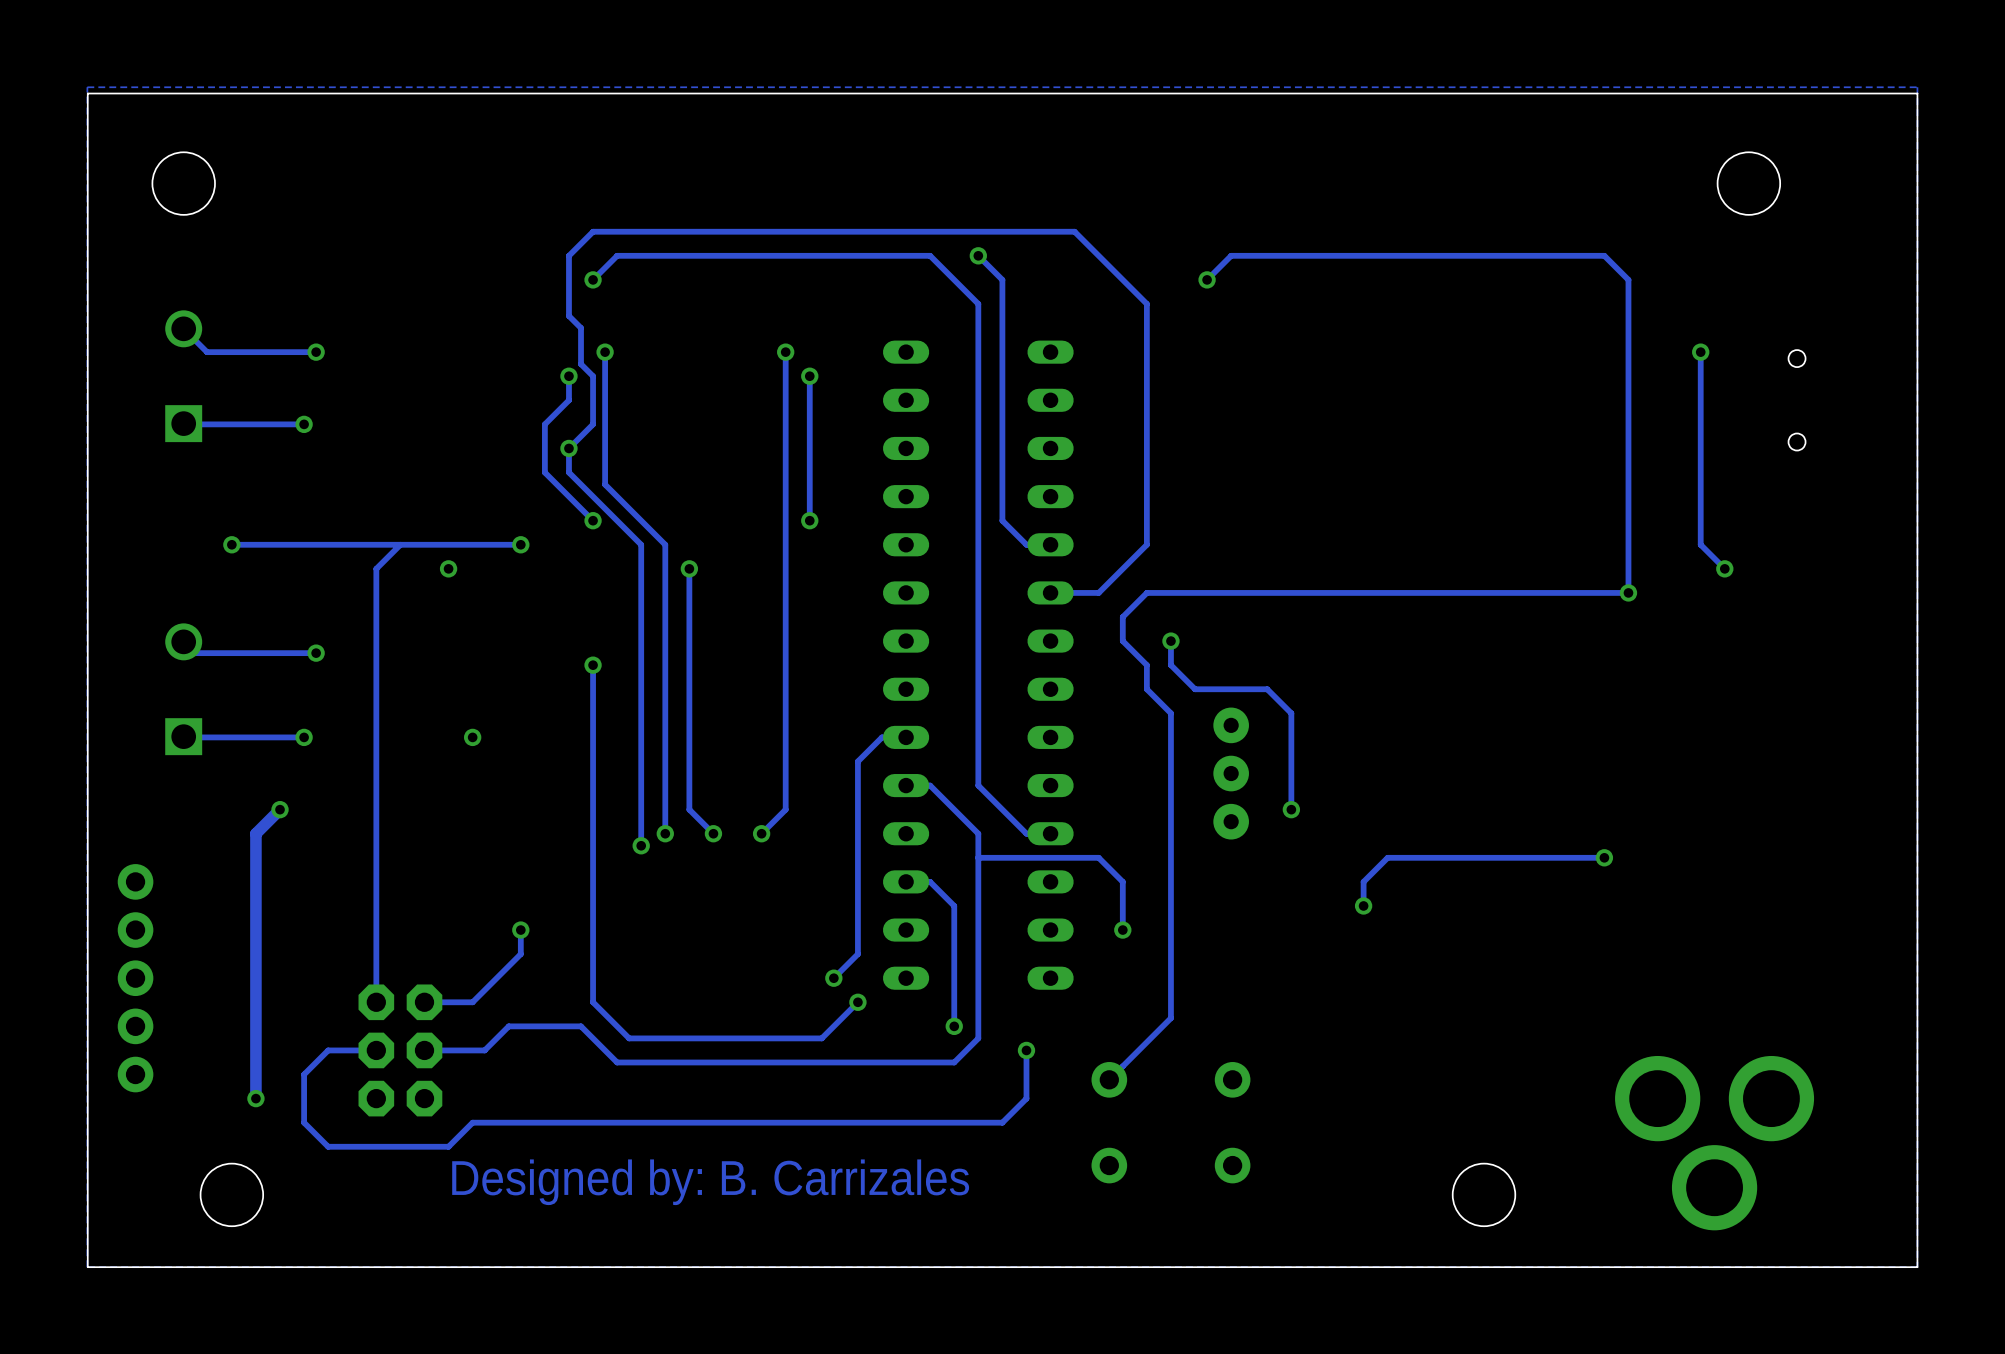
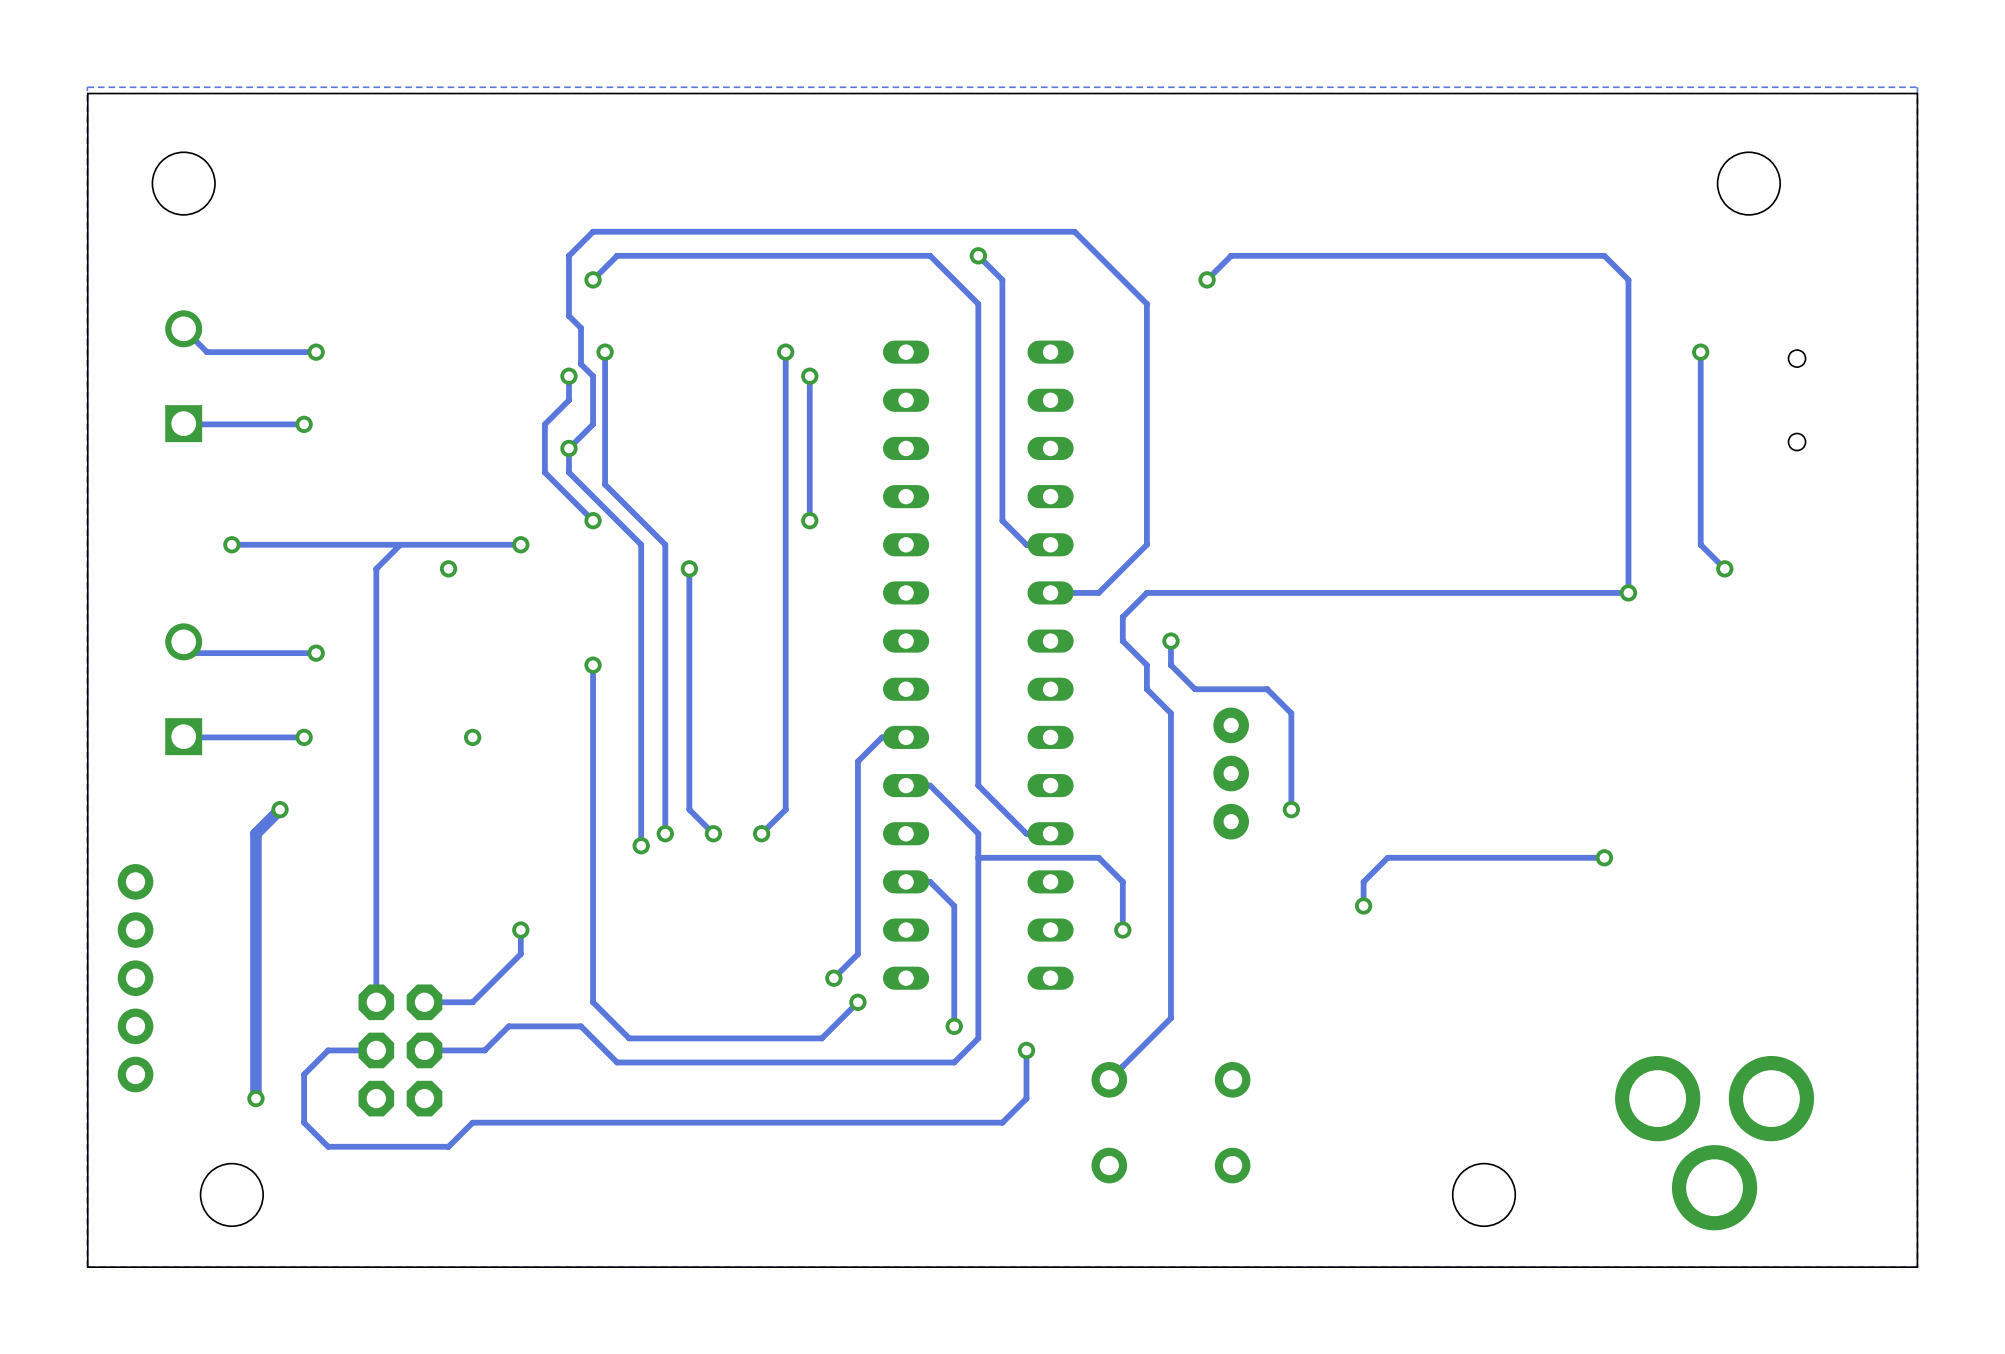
text: Designed by: B. Carrizales (710, 1182) -> none

